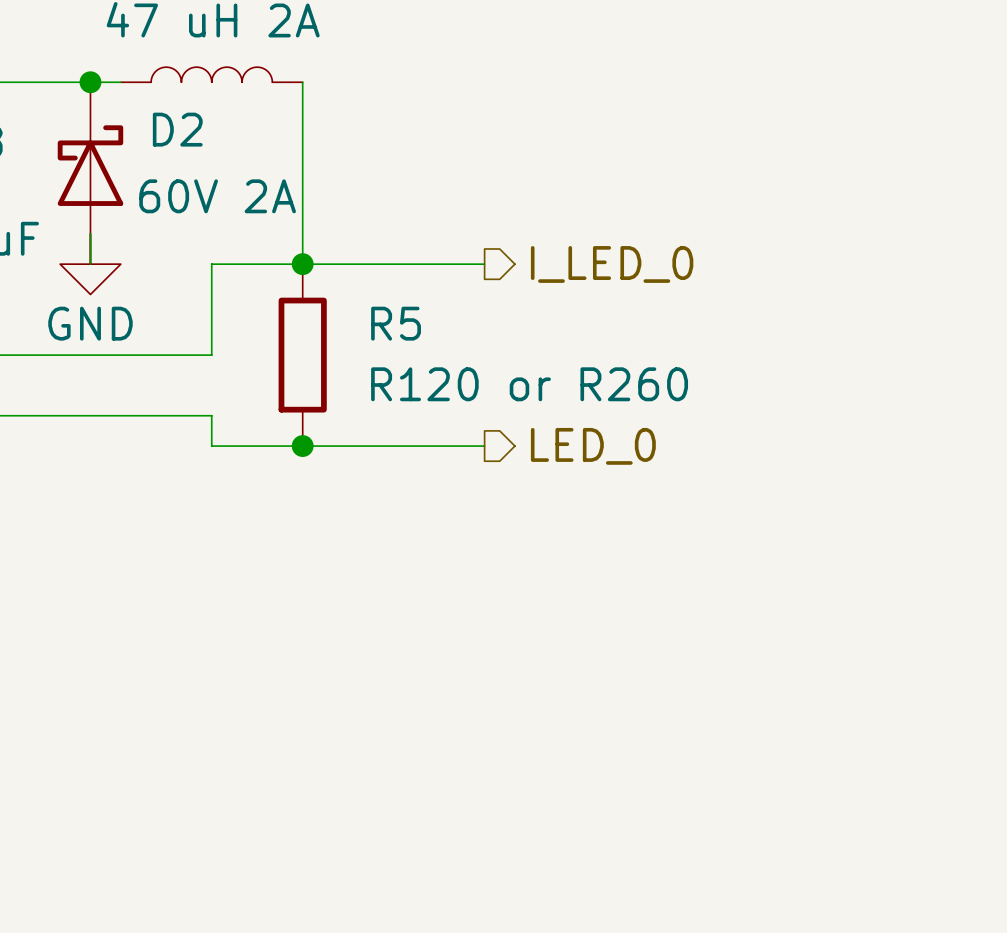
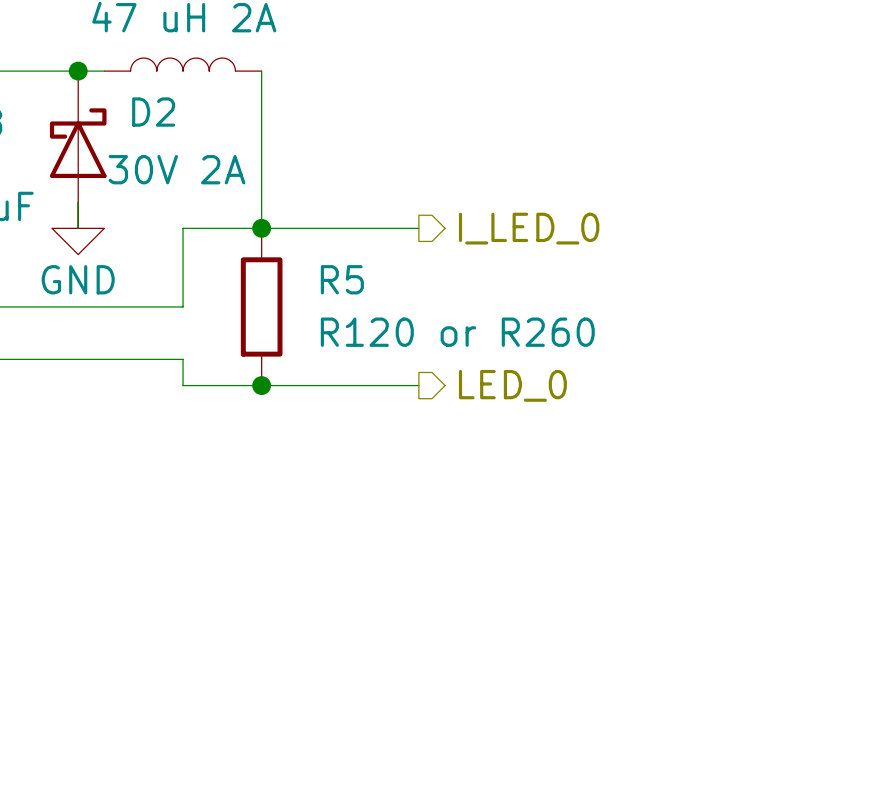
D2 value: 60V 2A (217, 196) -> 30V 2A (176, 169)

